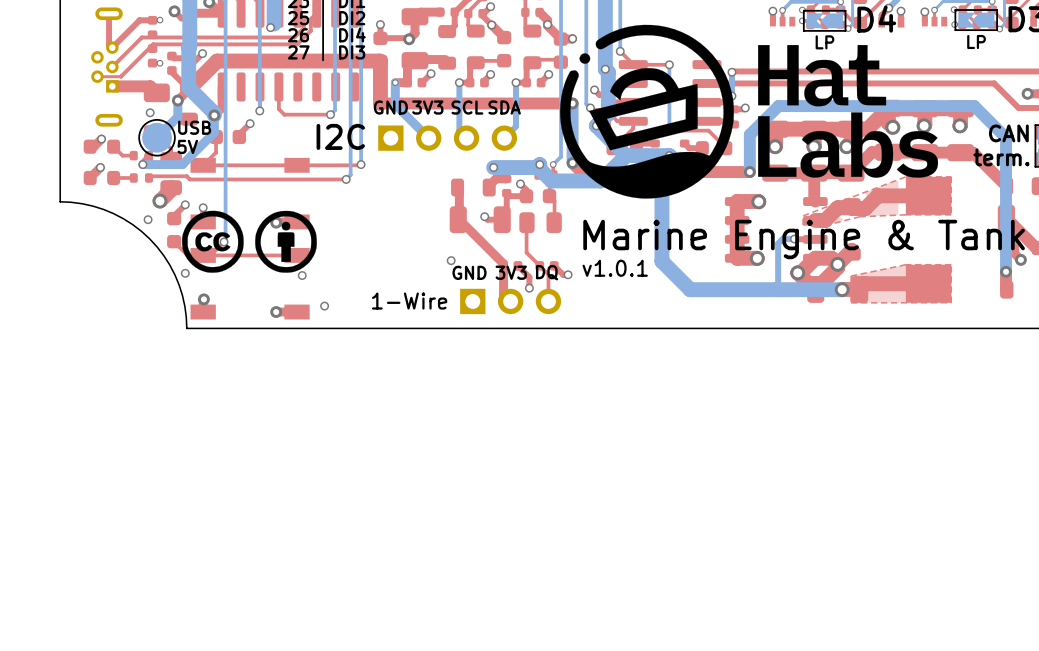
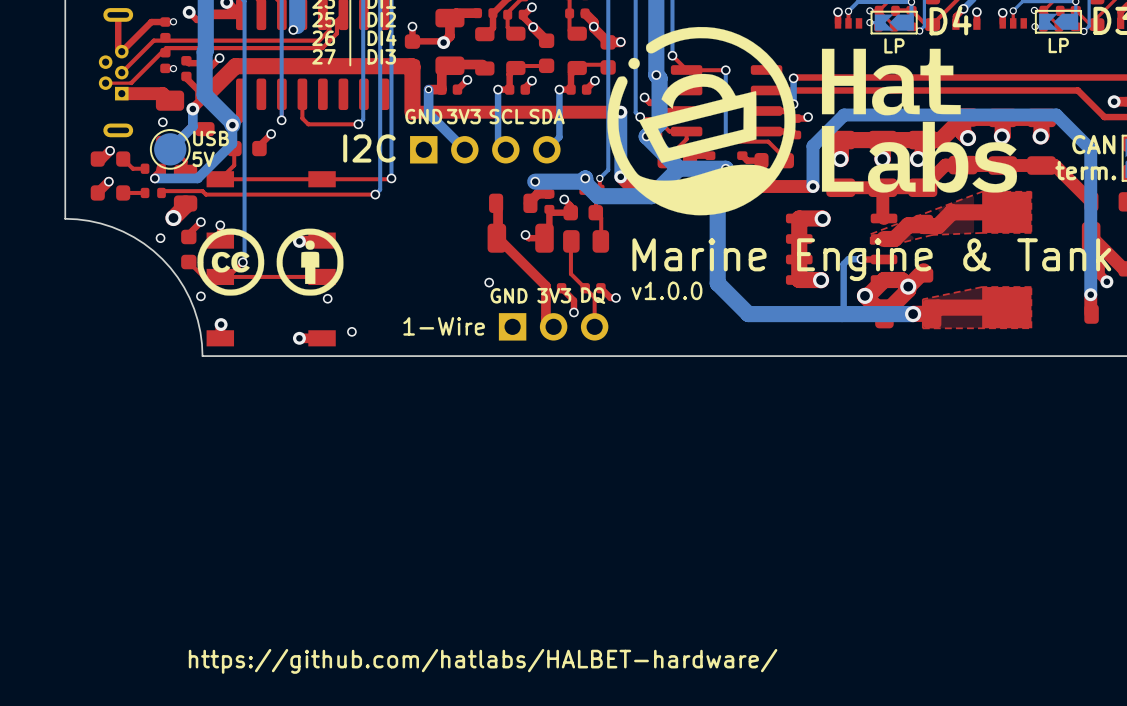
text: v1.0.1 (615, 268) -> v1.0.0 (667, 290)
text: none -> https://github.com/hatlabs/HALBET-hardware/ (483, 661)

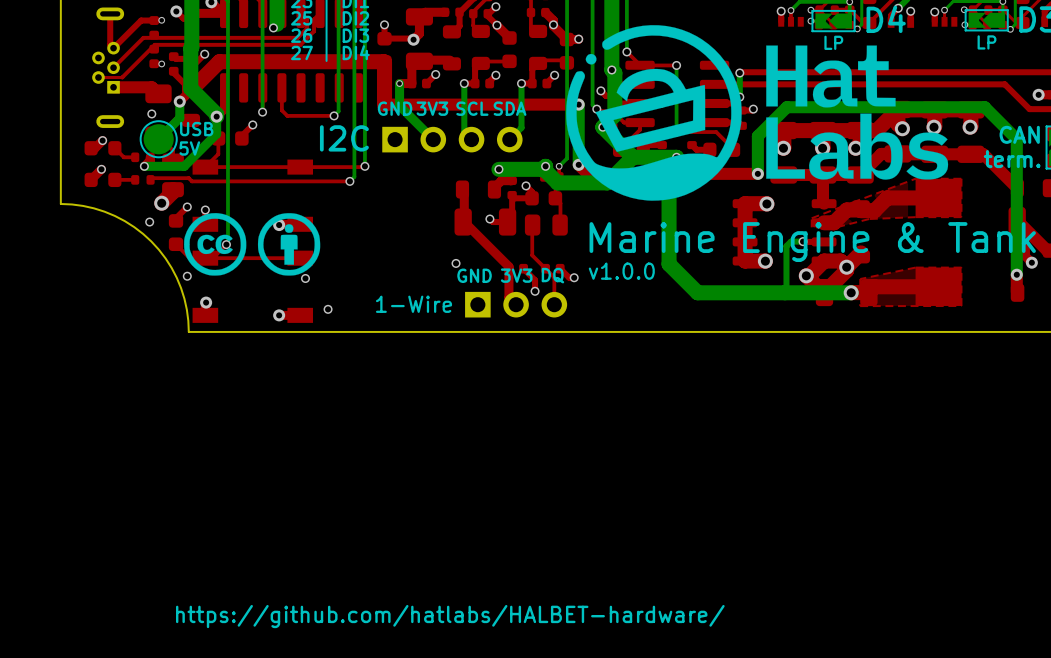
text: 26 DI4 (354, 37) -> 26 DI3 (330, 35)
text: 27 DI3 (354, 56) -> 27 DI4 (330, 52)

